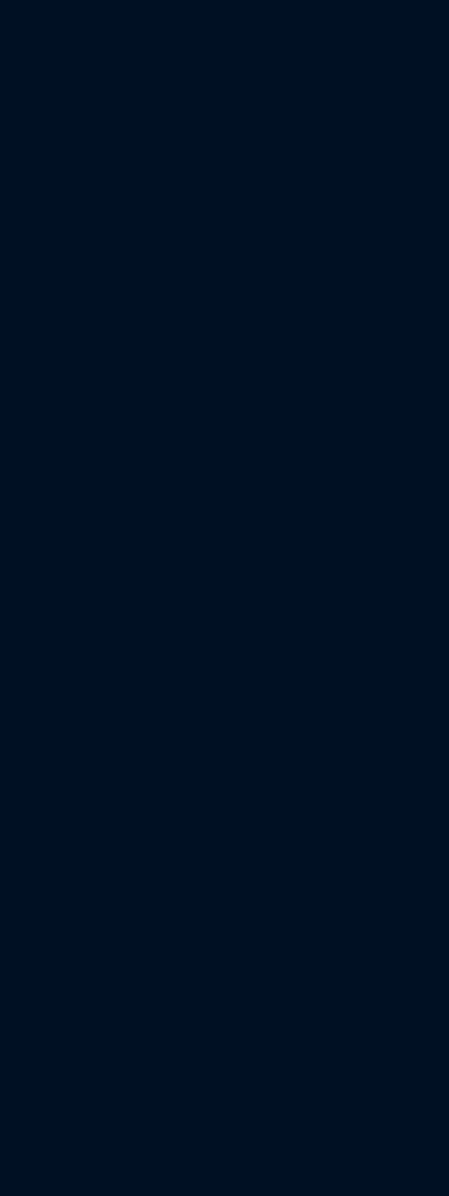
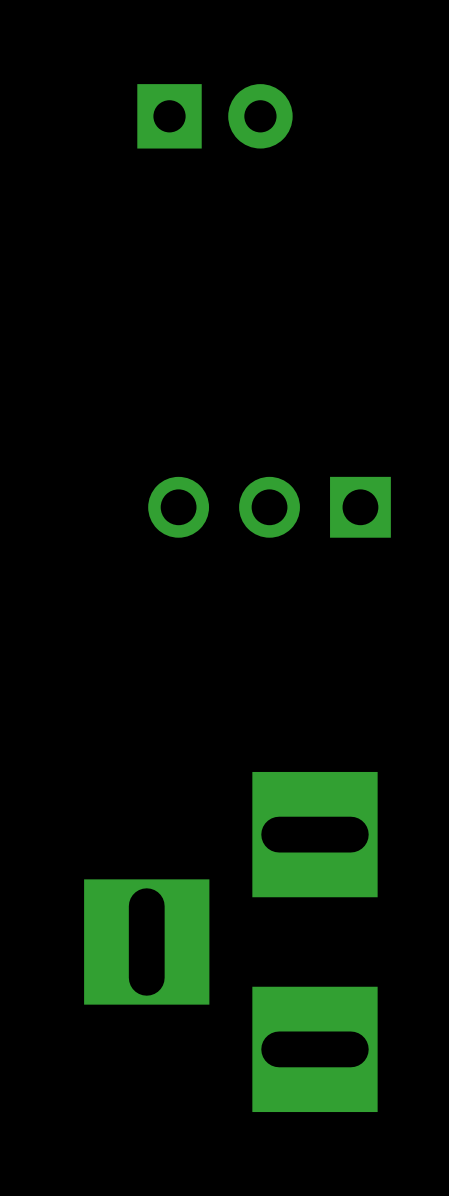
part: none -> (214, 116)
part: none -> (269, 507)
part: none -> (230, 942)

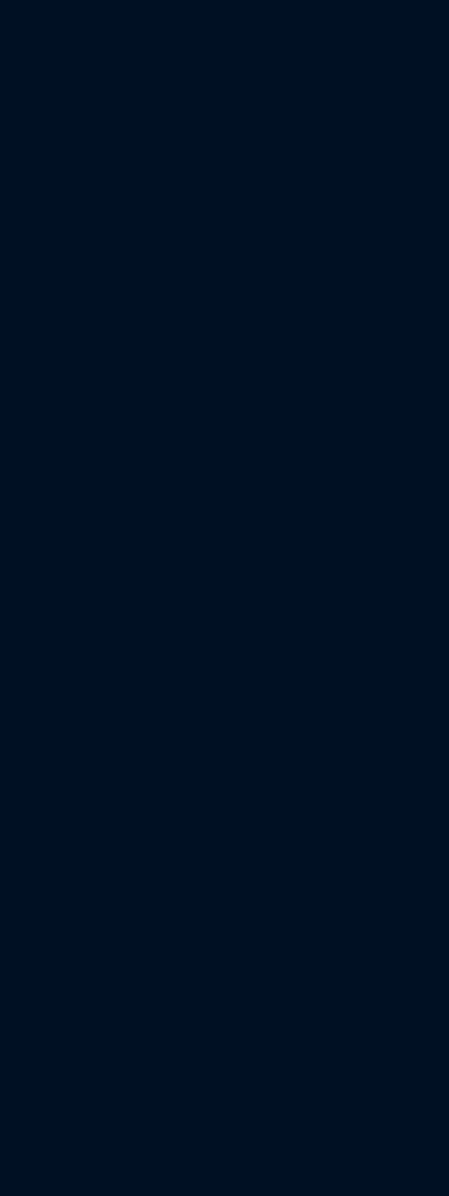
part: (214, 116) -> none
part: (269, 507) -> none
part: (230, 942) -> none

